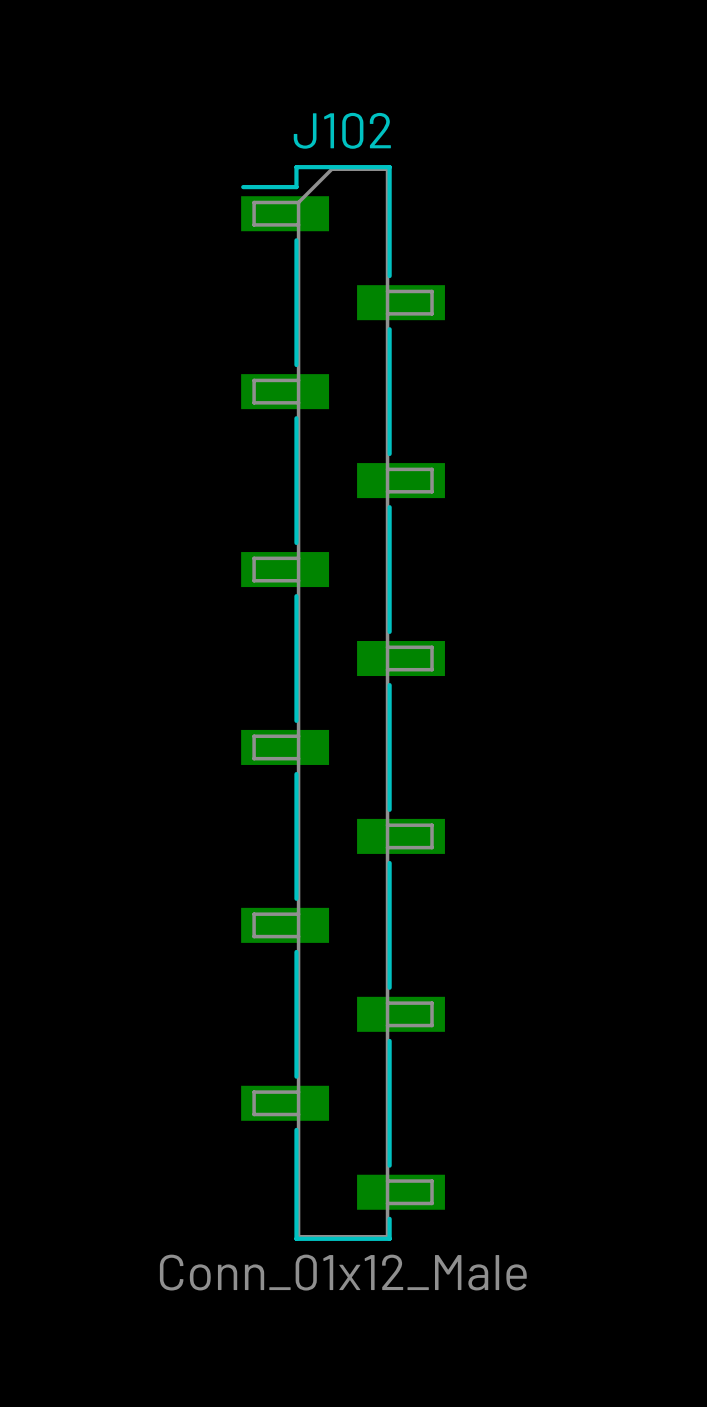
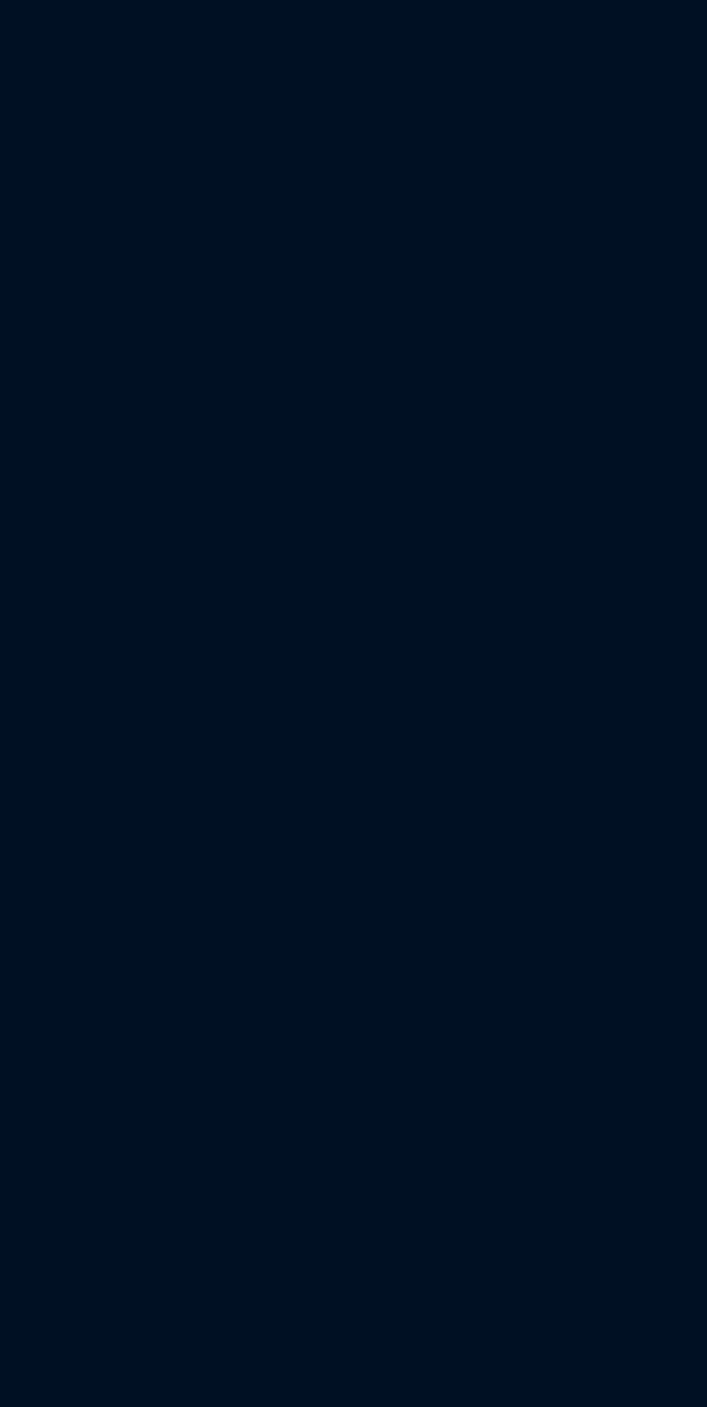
J102: Conn_01x12_Male (343, 702) -> none

